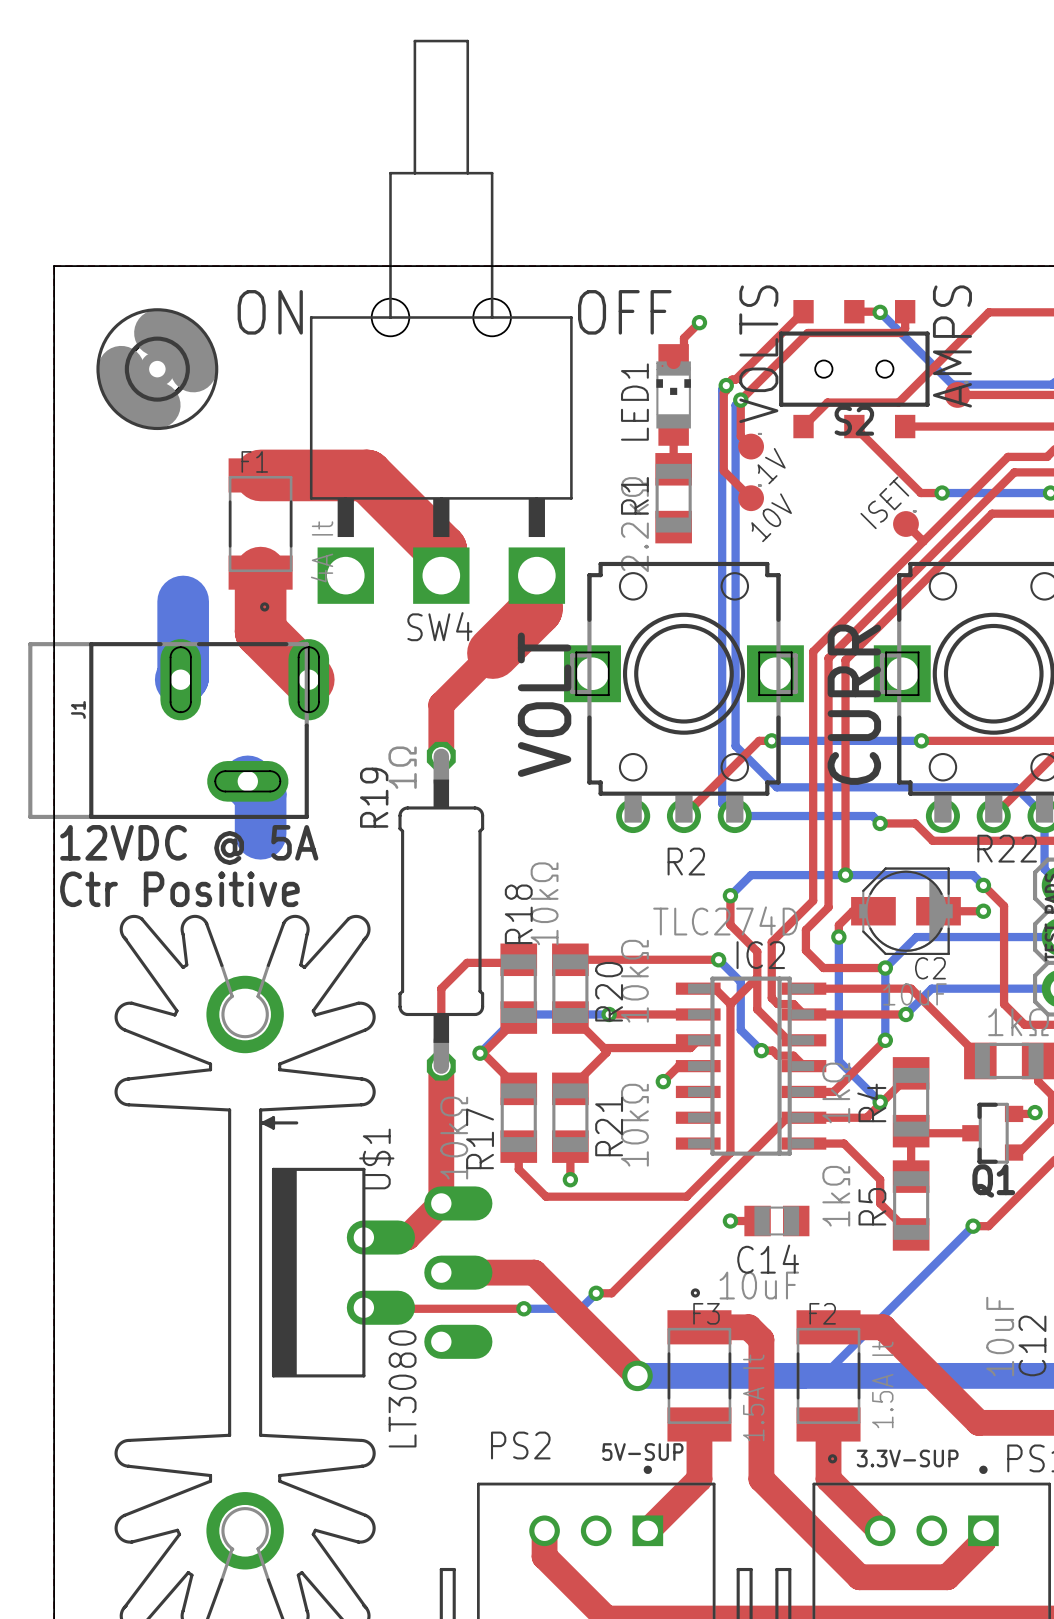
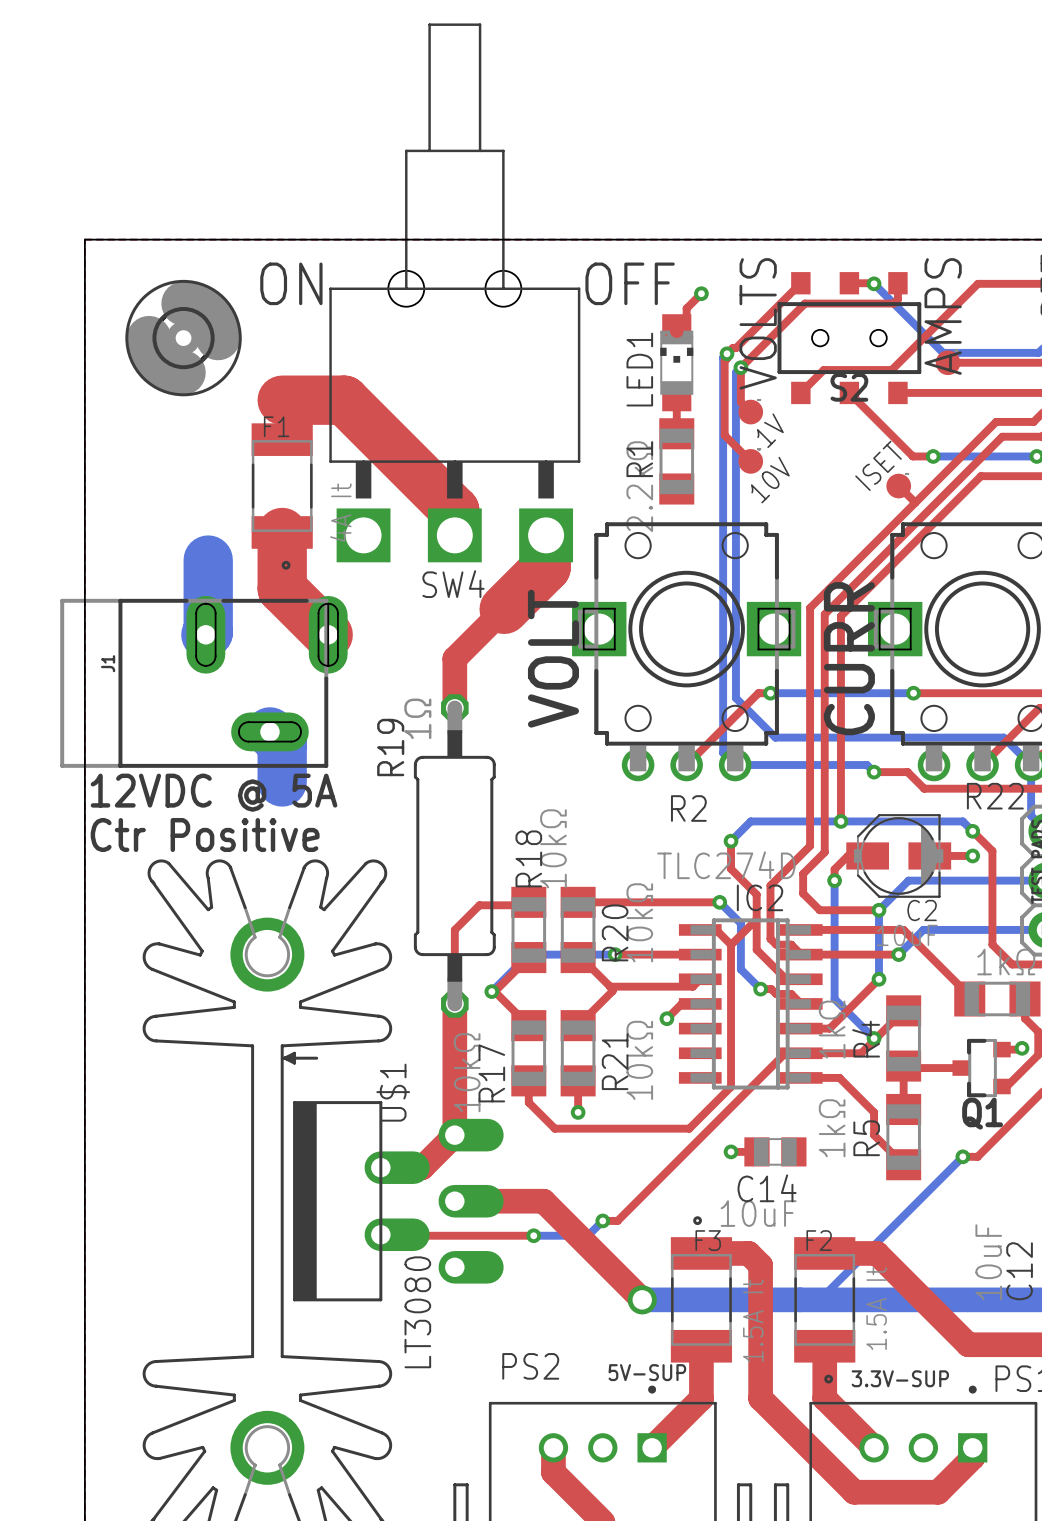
top track: (260, 475) (366, 475) -> (282, 400) (344, 400) (383, 439)

